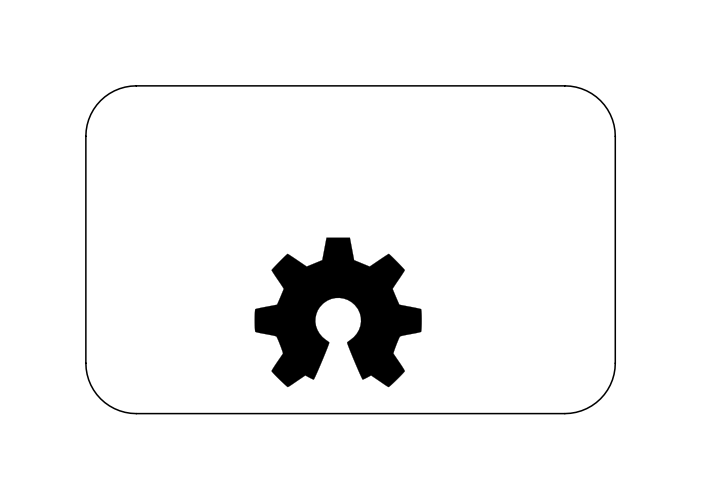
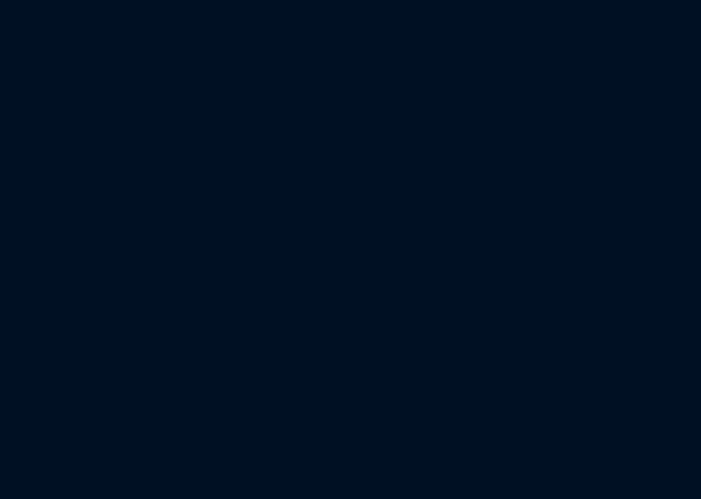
board edge: (136, 85) (564, 85) (576, 87) (591, 93) (607, 109) (612, 119) (615, 136) (615, 363) (612, 379) (607, 390) (600, 398) (586, 408) (564, 413) (136, 413) (119, 410) (109, 405) (93, 390) (86, 368) (86, 130) (90, 114) (100, 100) (114, 90) (136, 85) -> none
drawing: [254, 237, 422, 388] -> none

